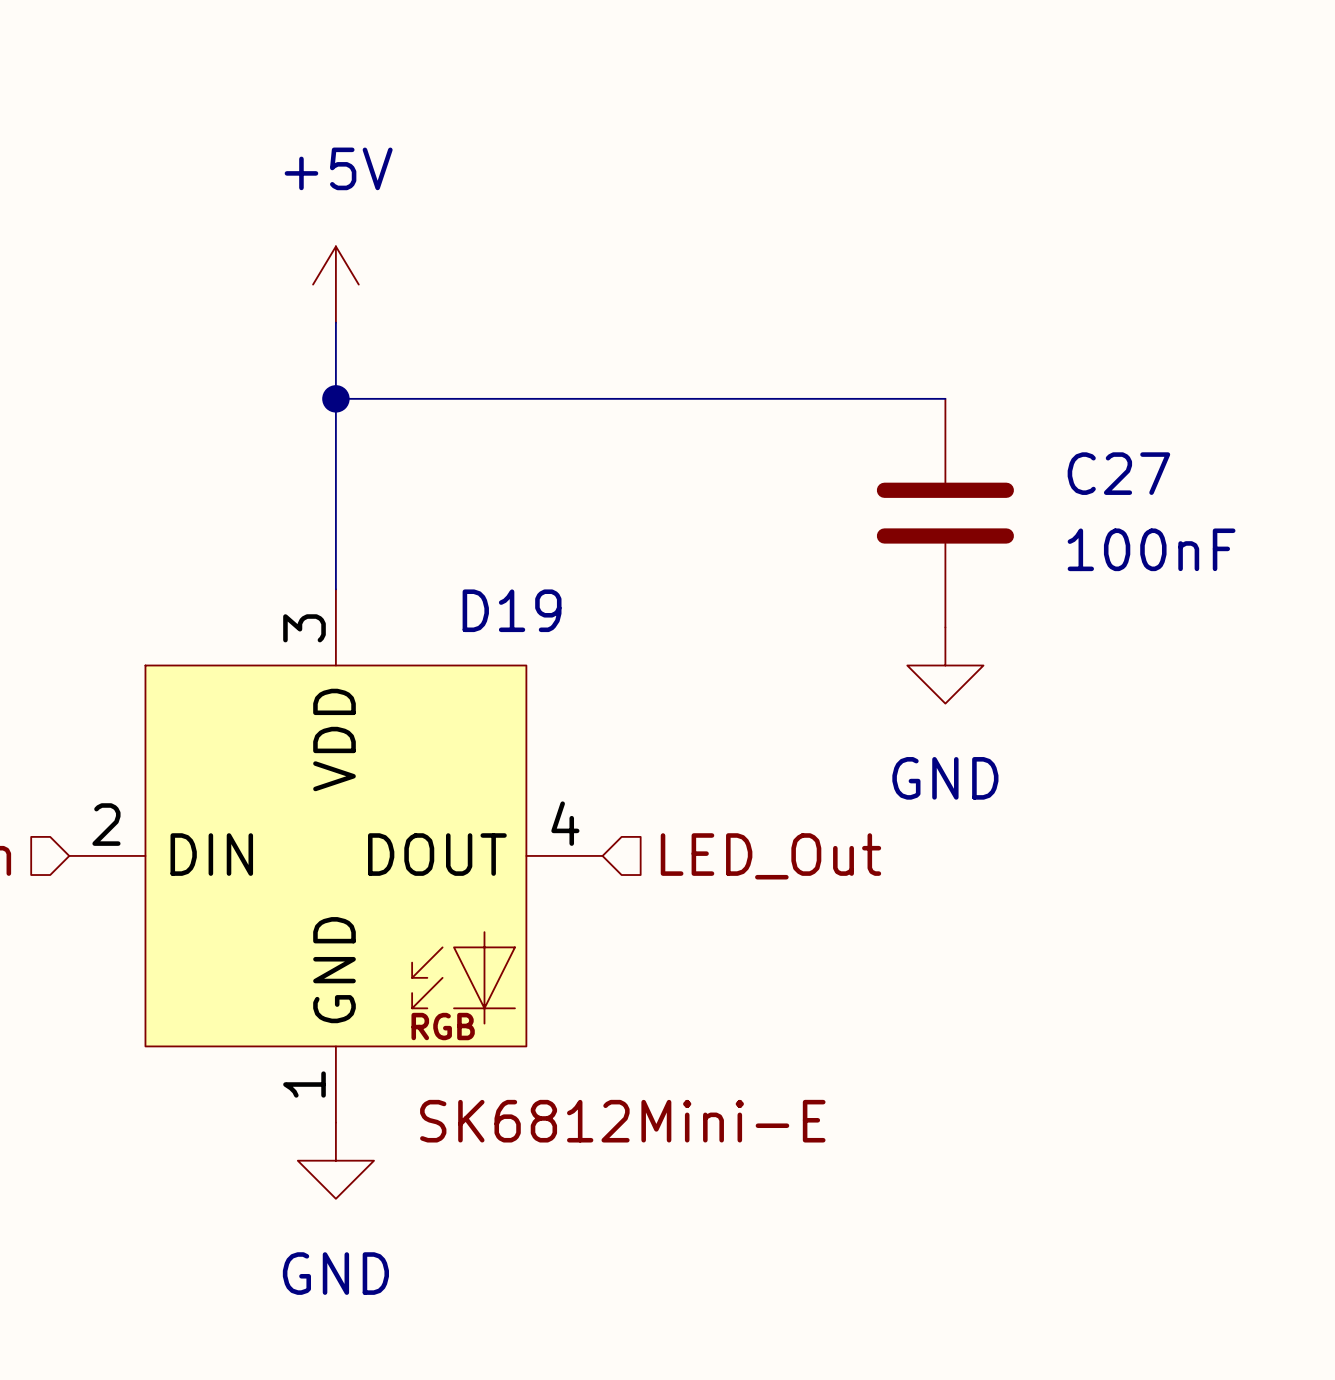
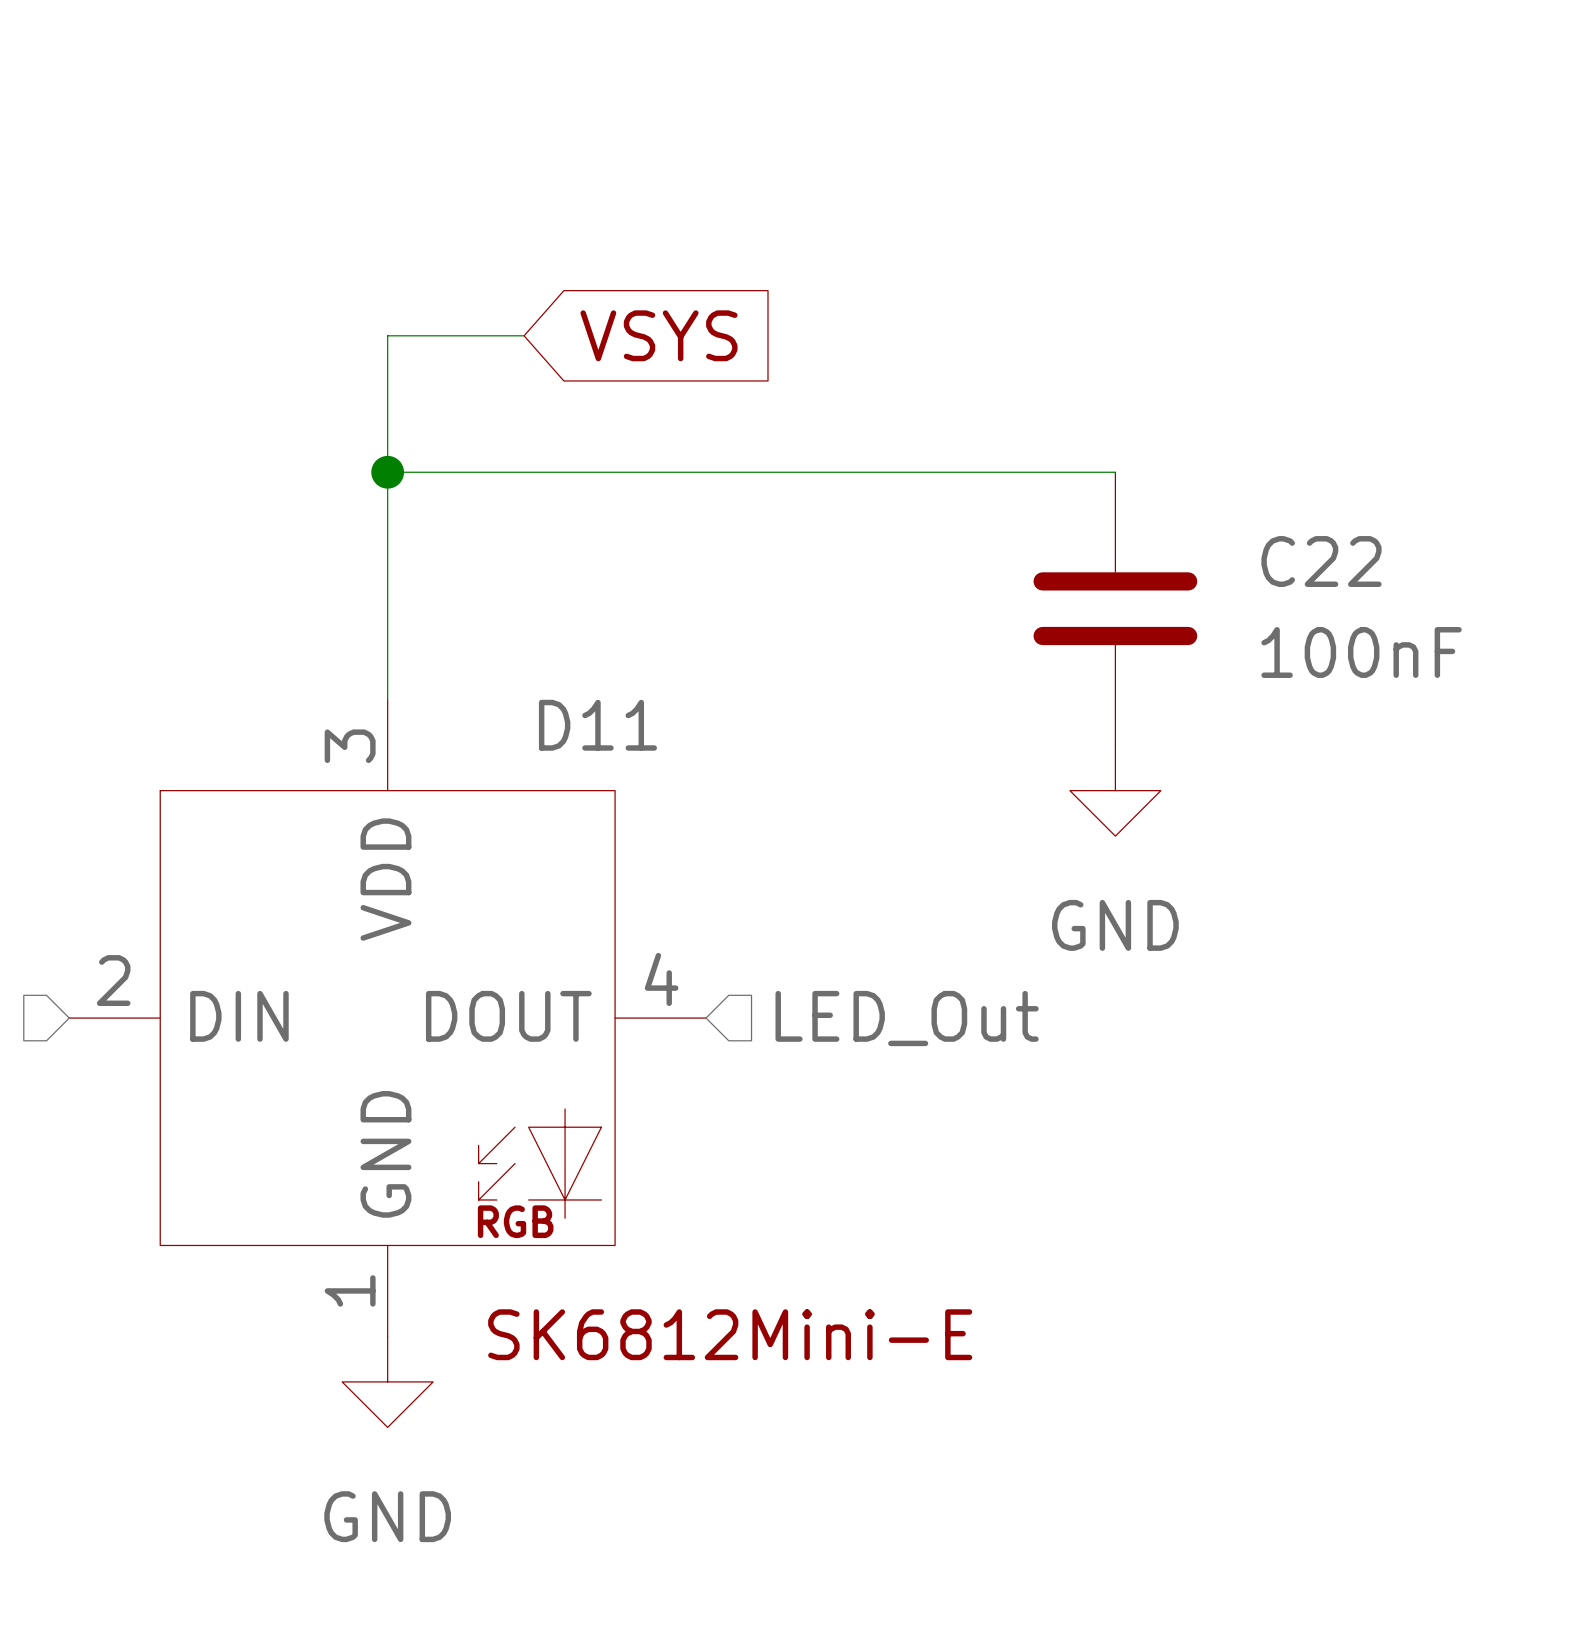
power symbol: +5V (335, 284) -> none
wire: none -> (524, 335) (387, 335) (387, 381)
global label: none -> VSYS (659, 335)
C27 name: C27 (1118, 473) -> C22 (1321, 561)
D19 name: D19 (512, 610) -> D11 (597, 725)

